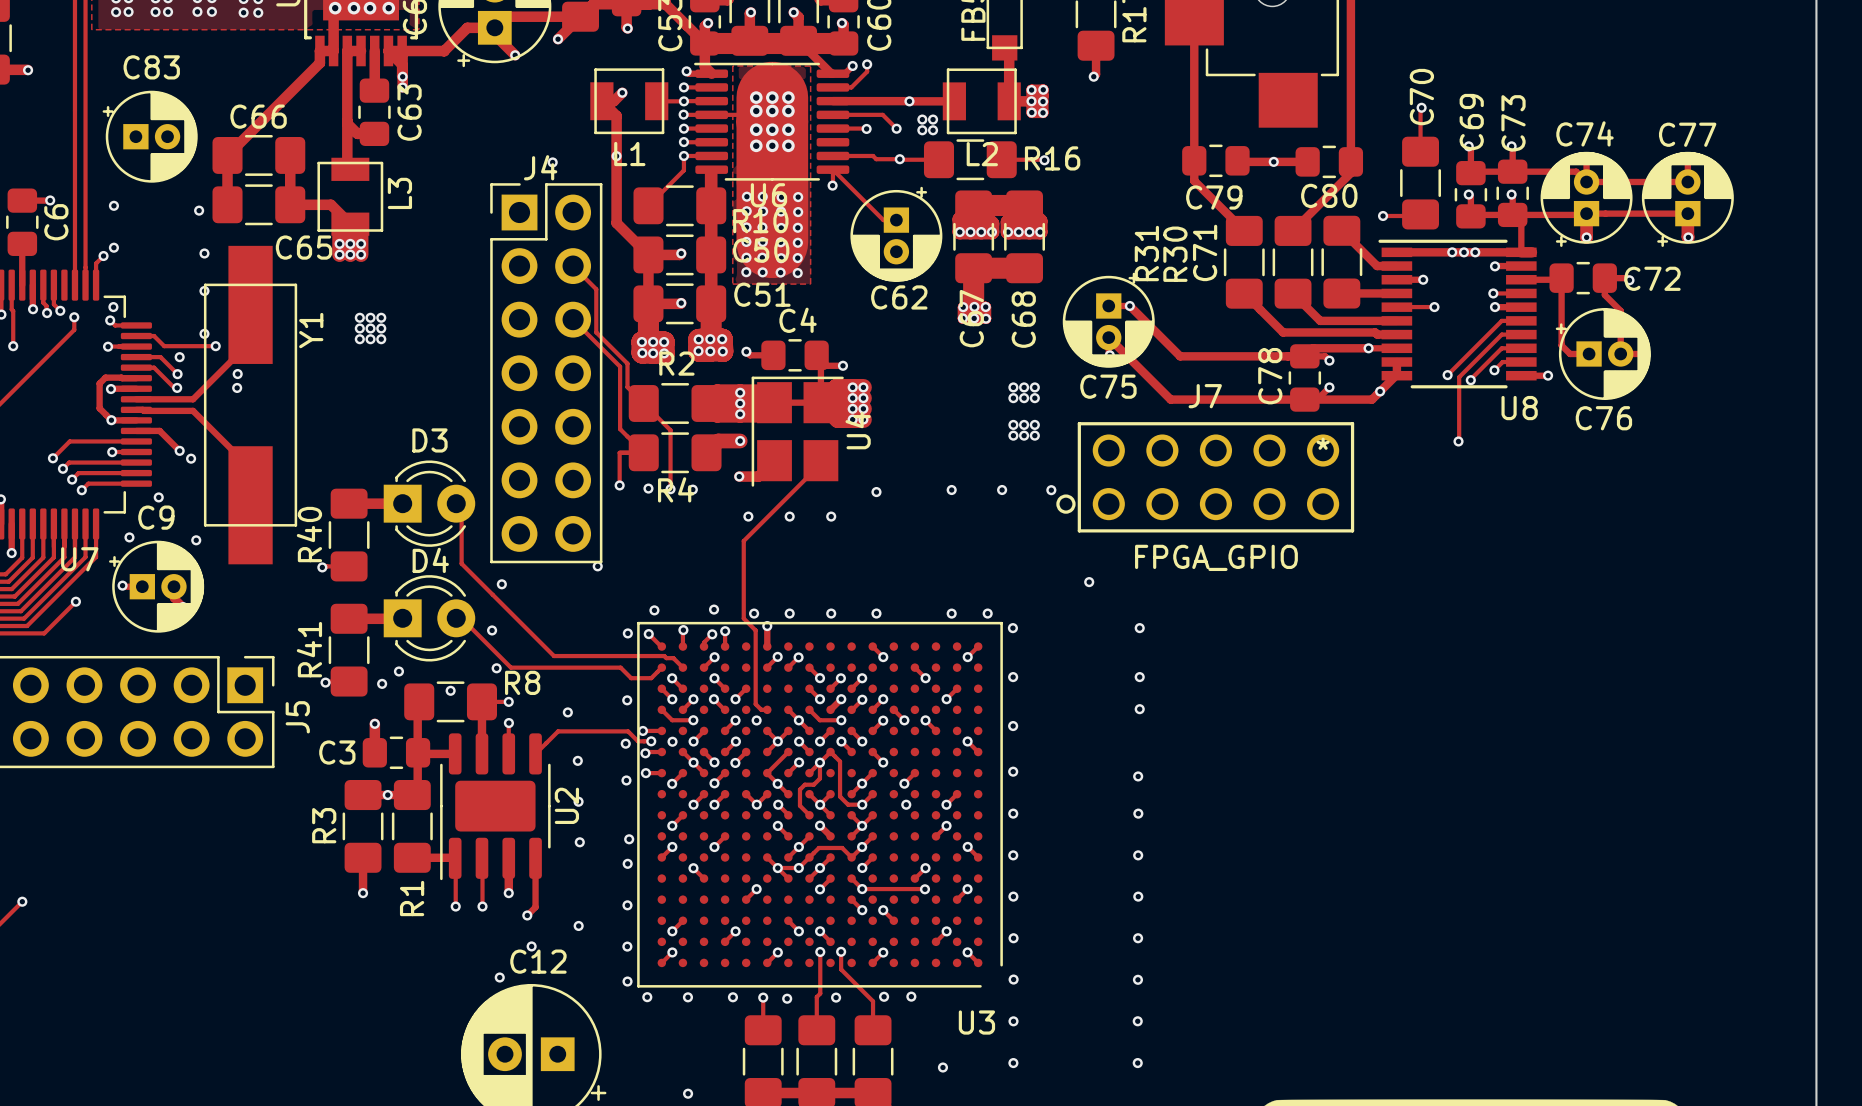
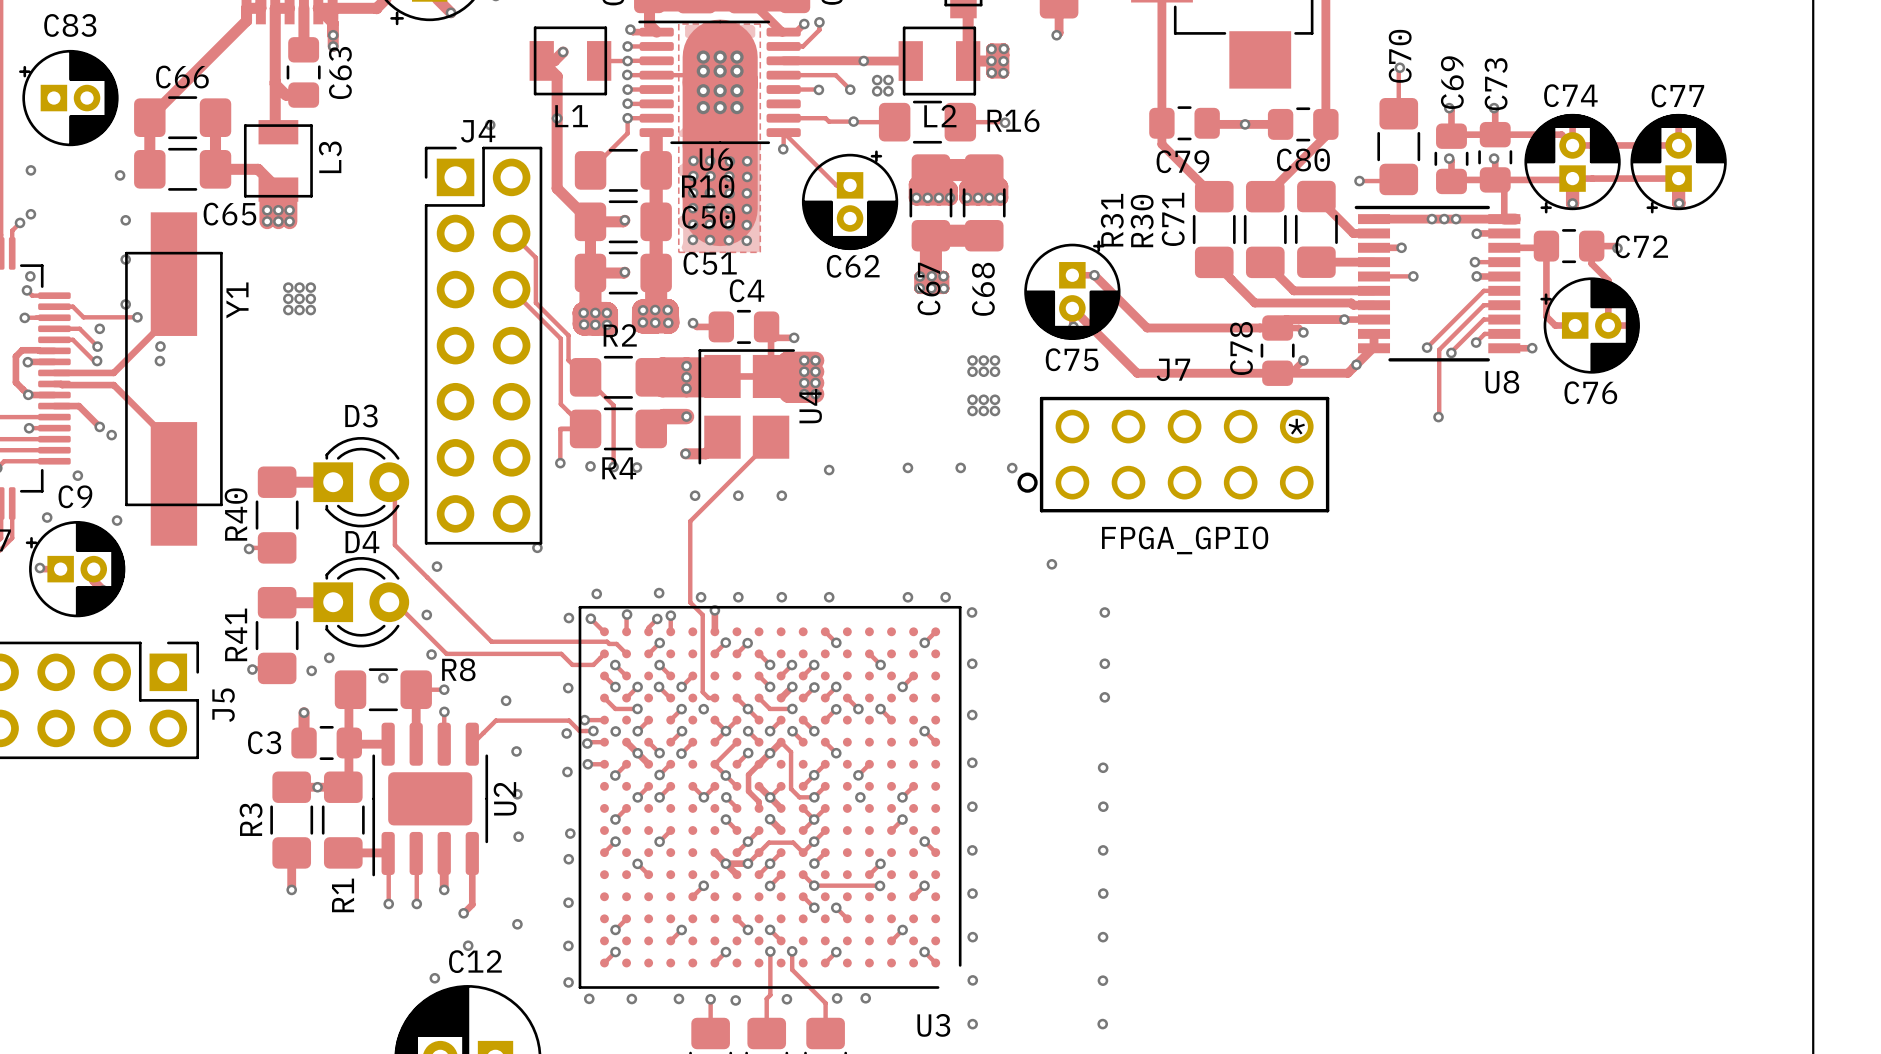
track: (819, 762) (819, 778) (813, 784) (804, 784) (799, 789) (799, 805) (809, 815) -> (781, 742) (748, 774) (748, 791) (759, 801) (759, 808)

